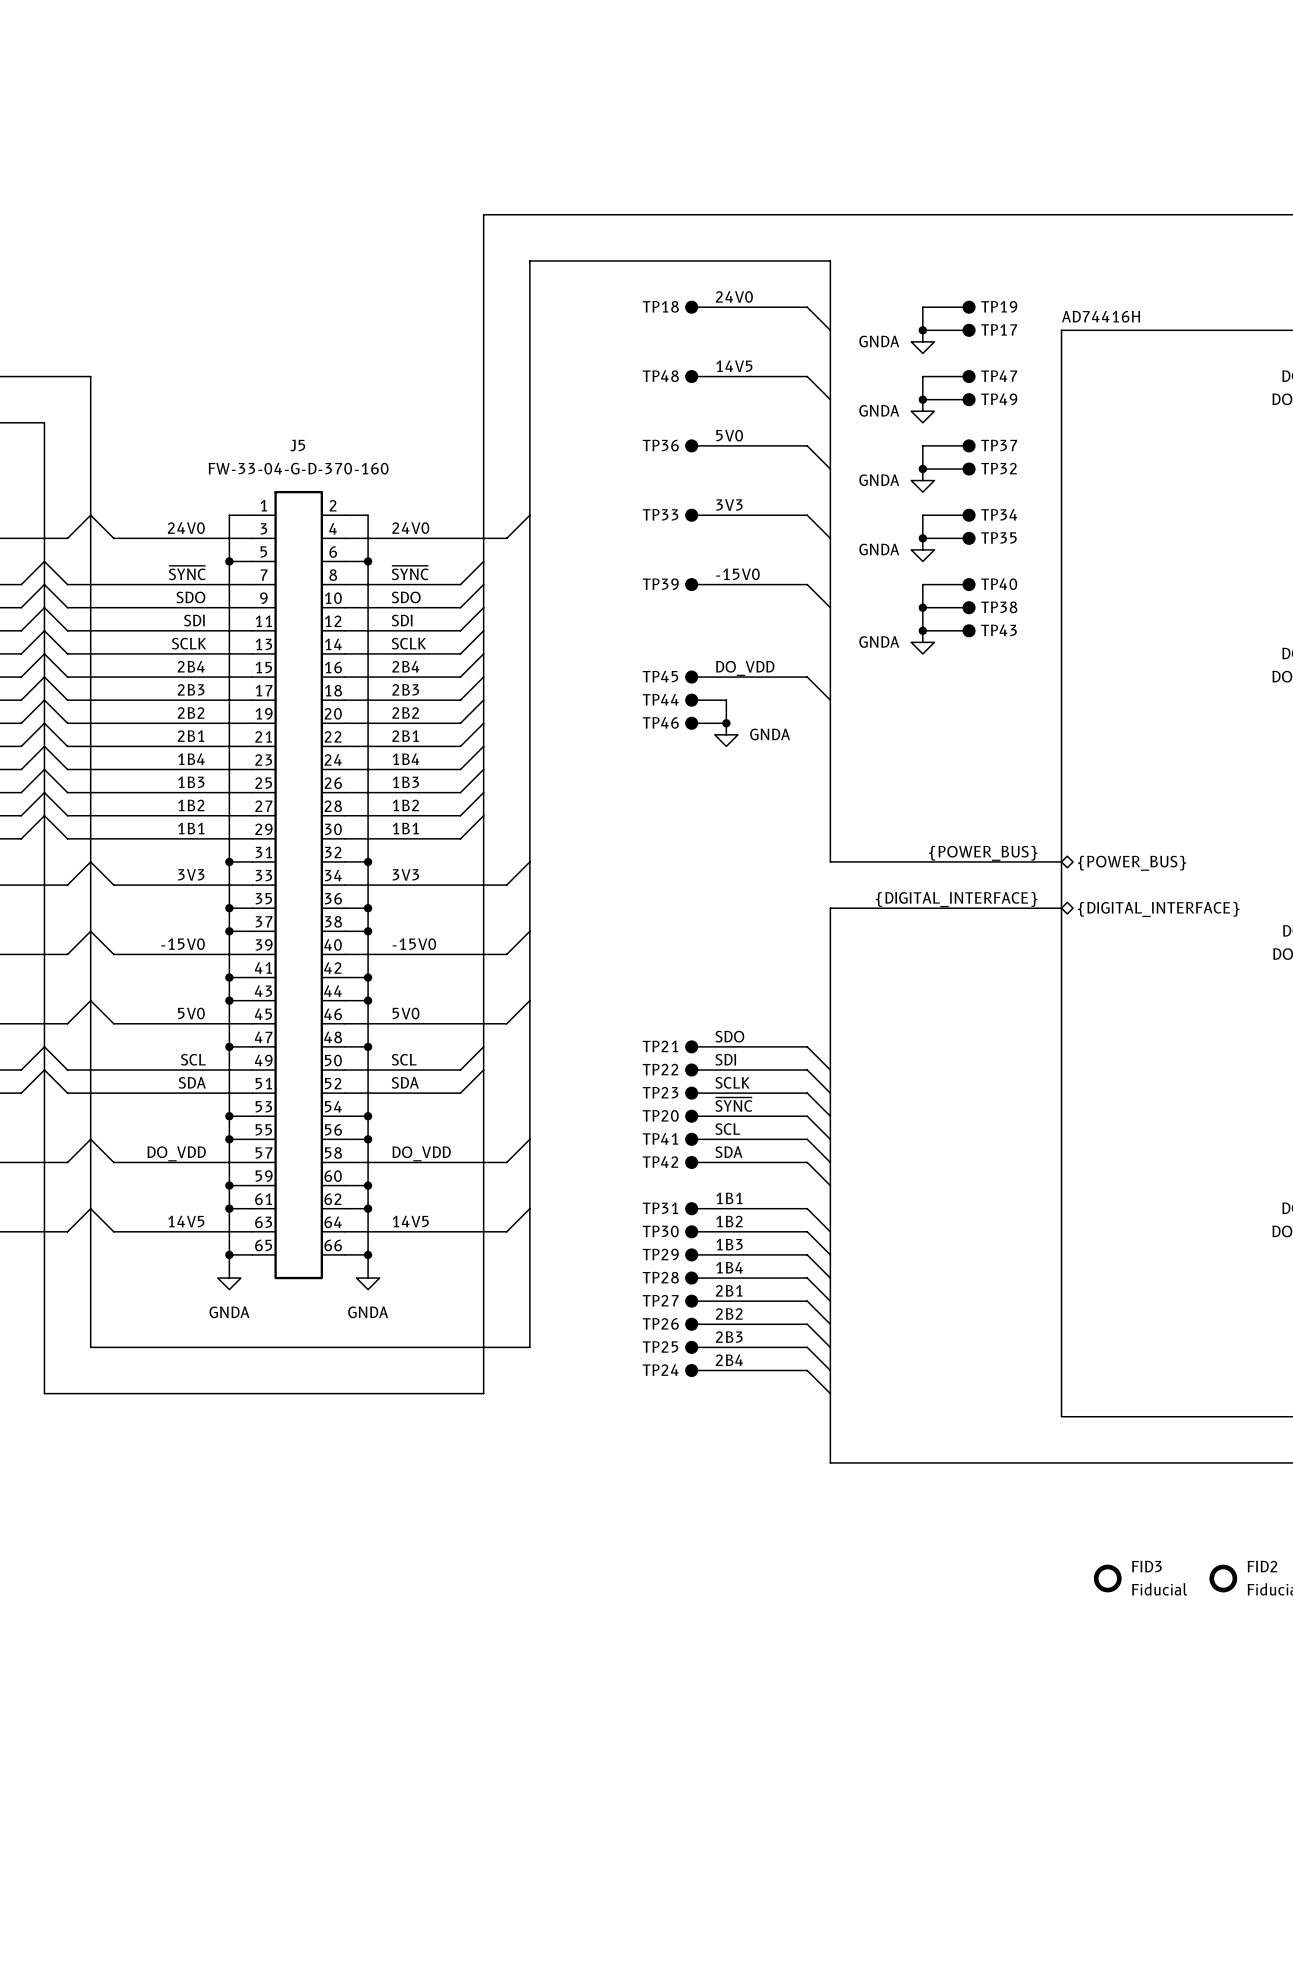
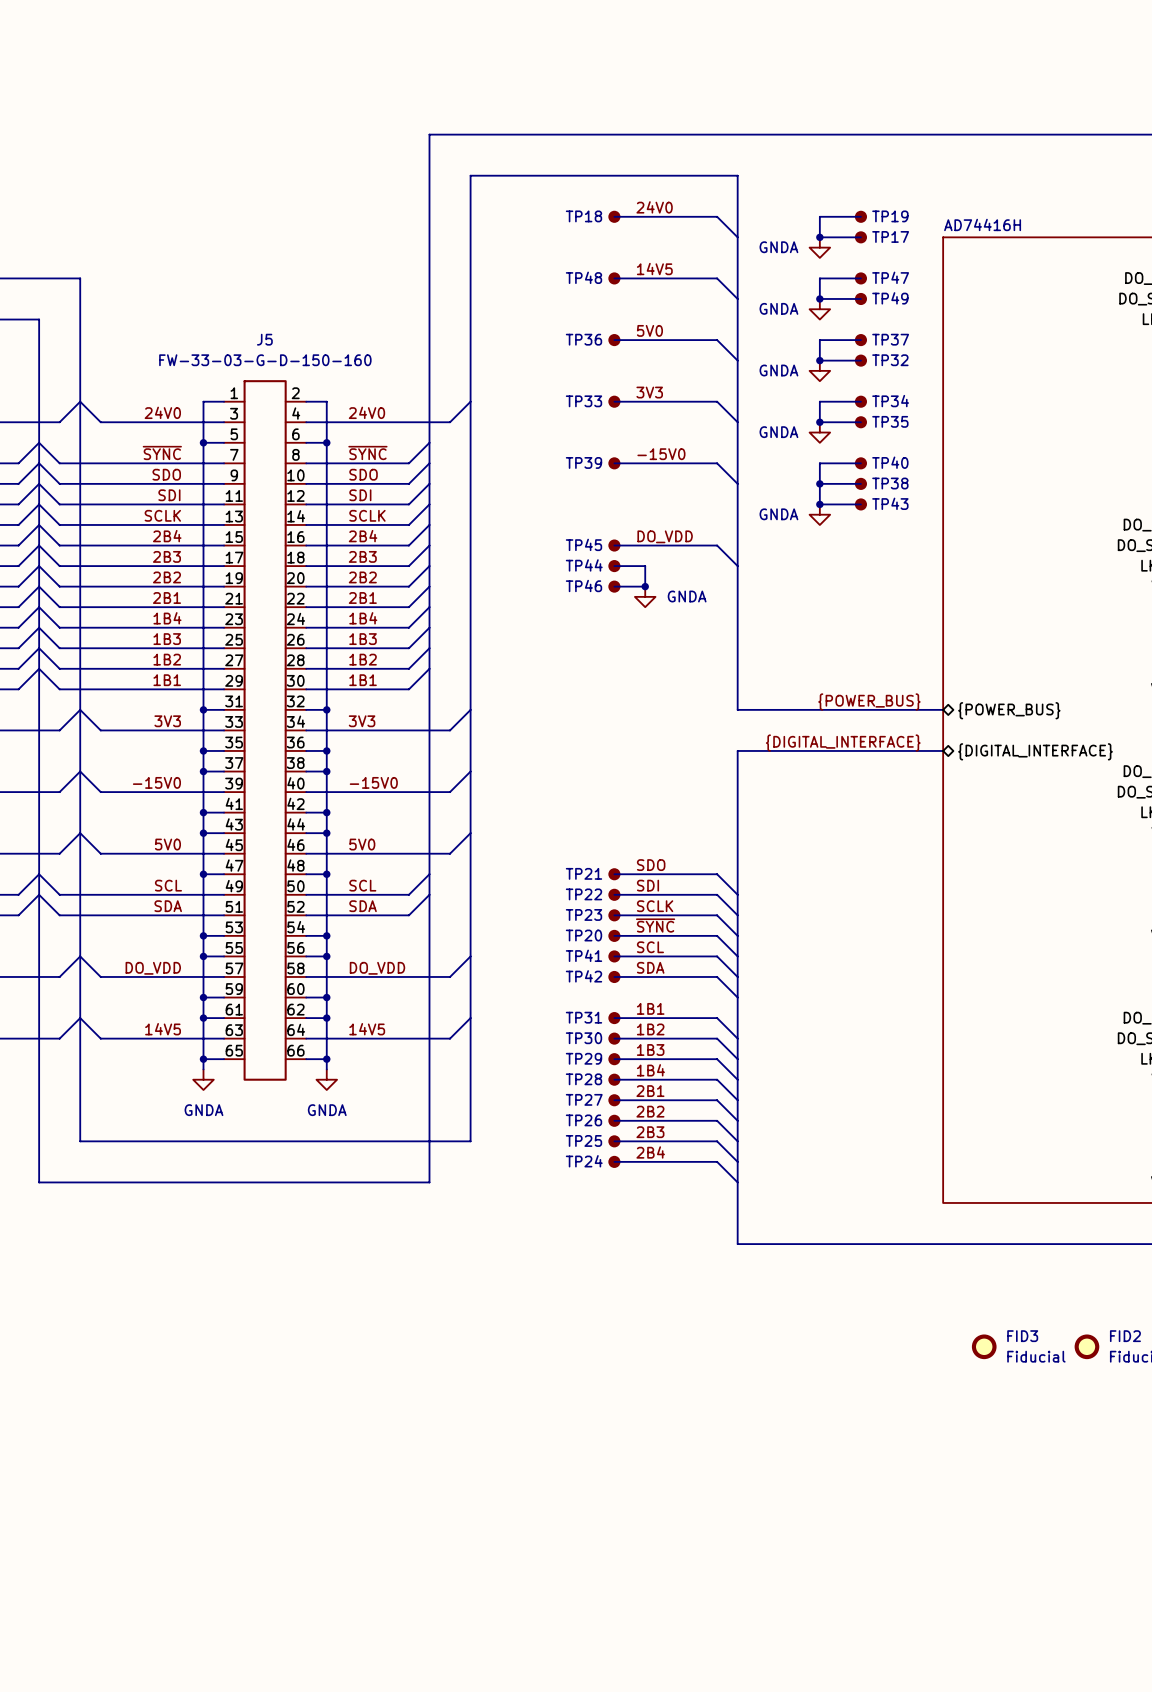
J5 value: FW-33-04-G-D-370-160 (298, 468) -> FW-33-03-G-D-150-160 (265, 360)

